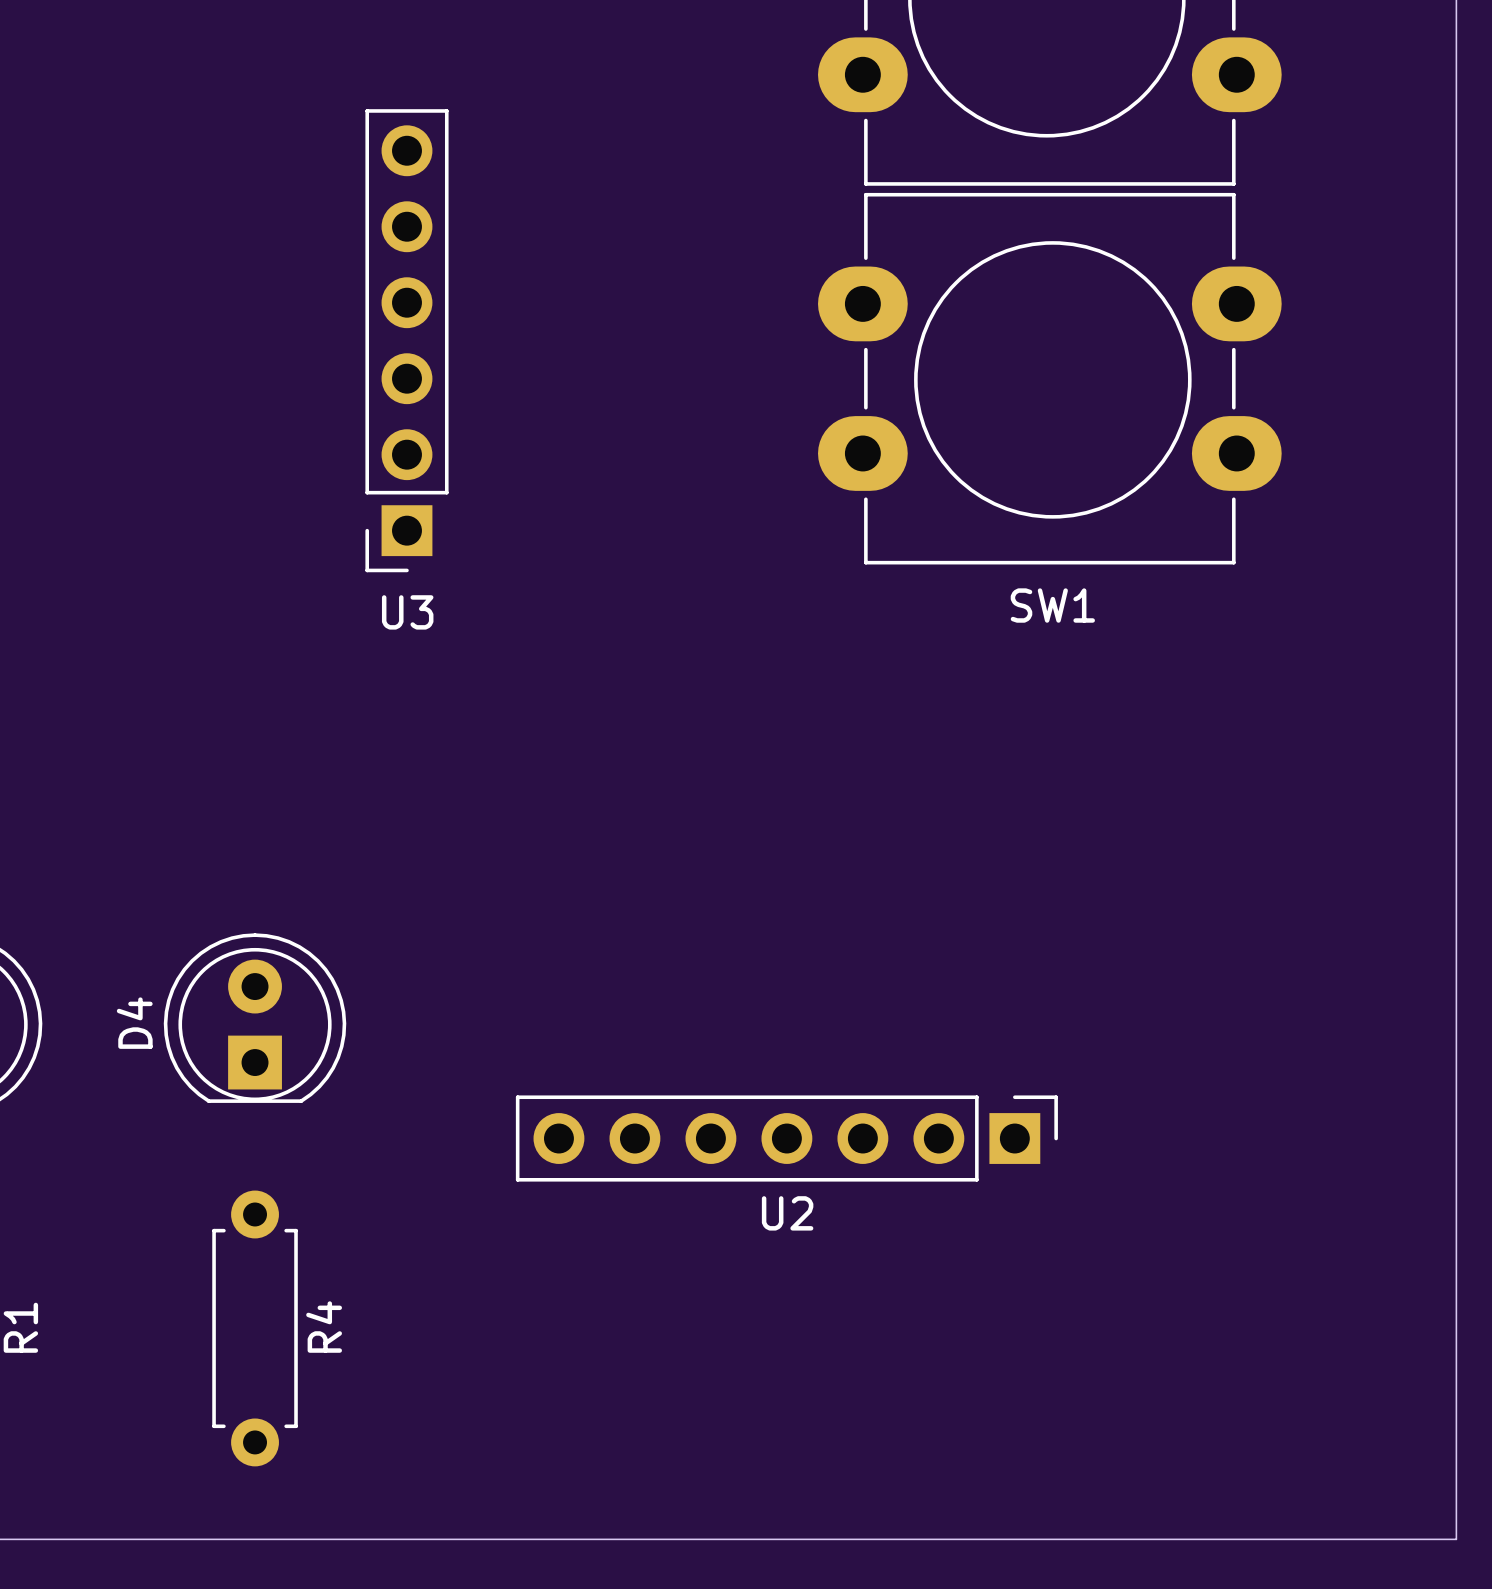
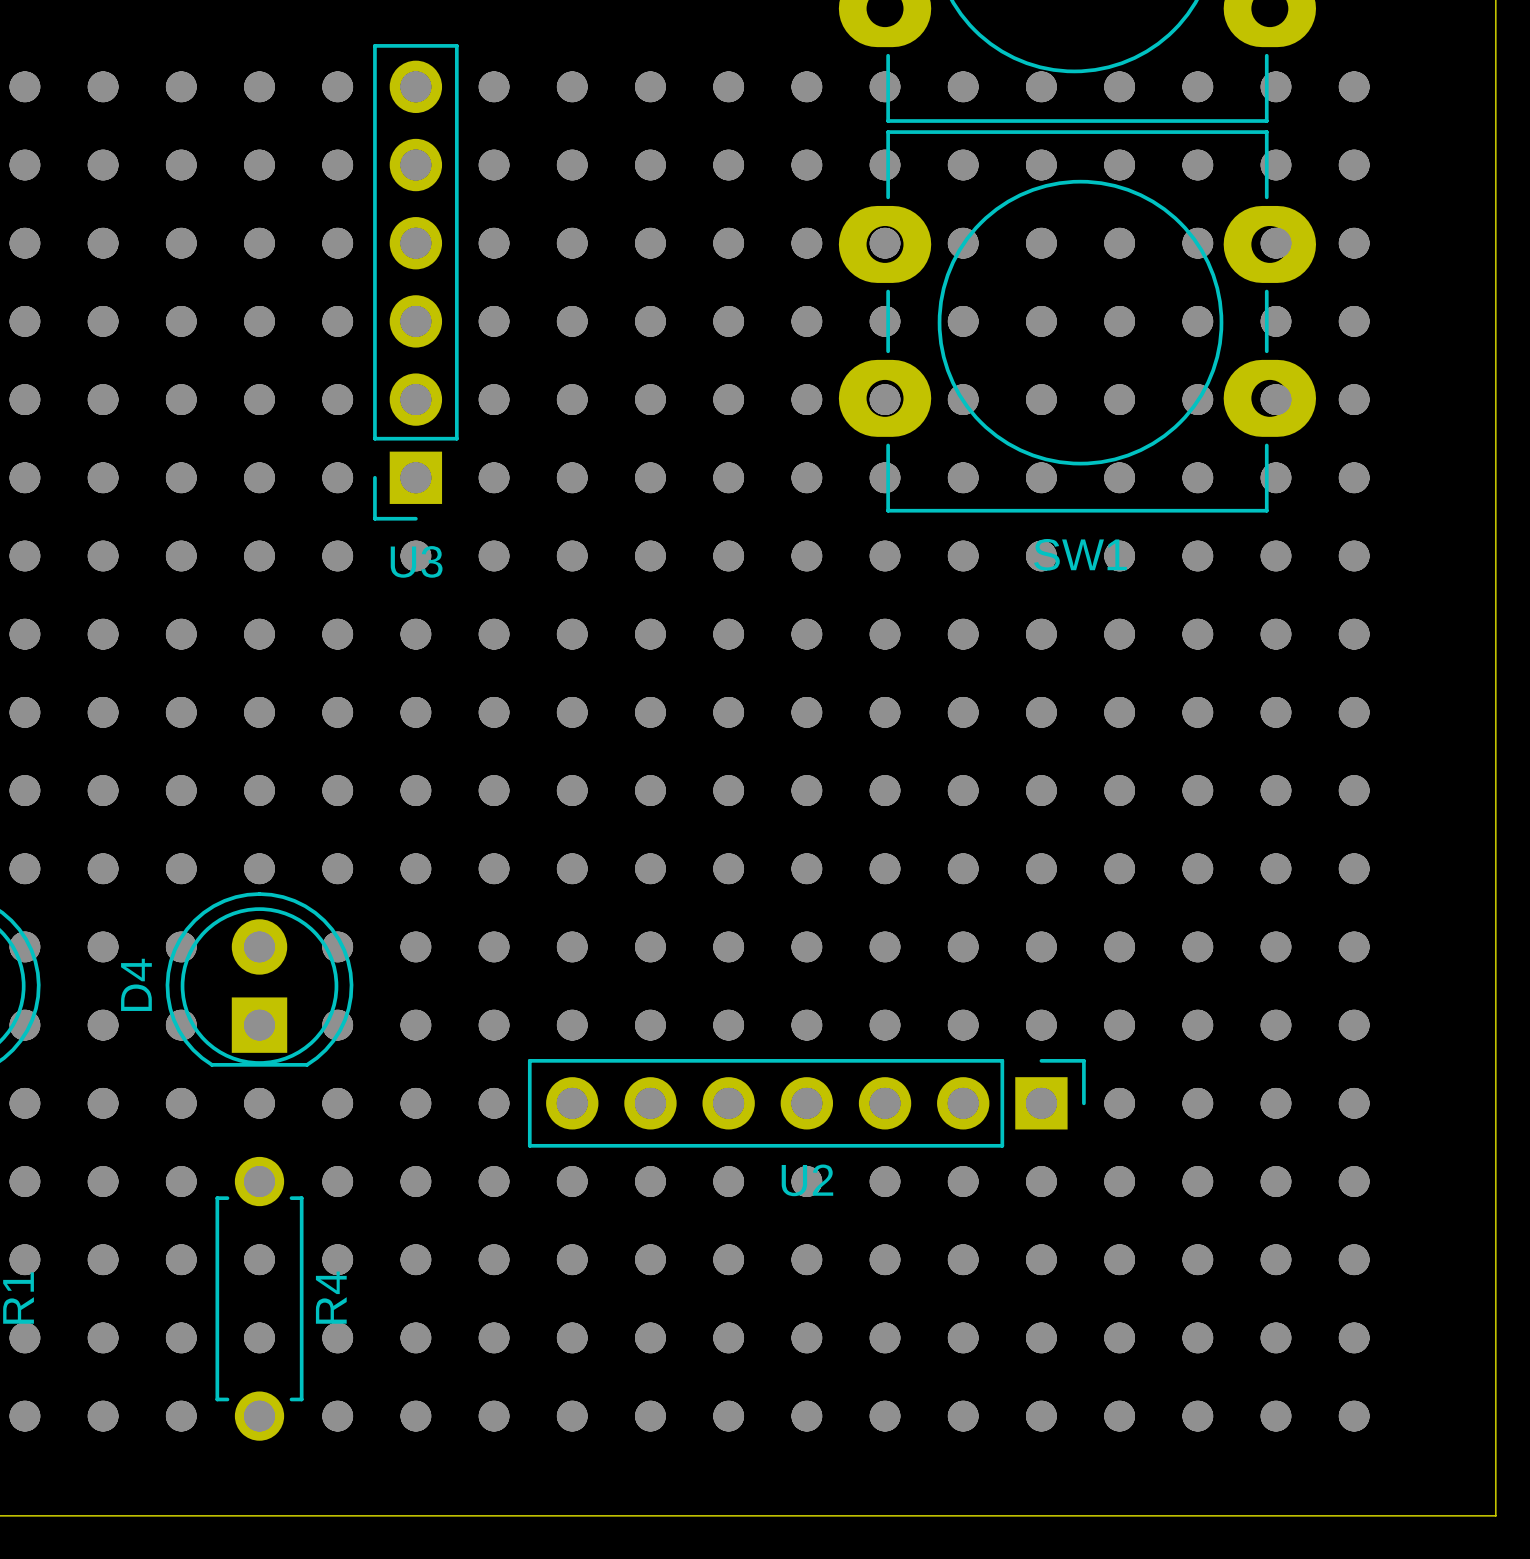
drawing: none -> [9, 71, 41, 103]
drawing: none -> [87, 71, 119, 103]
drawing: none -> [165, 71, 197, 103]
drawing: none -> [244, 71, 275, 103]
drawing: none -> [322, 71, 354, 103]
drawing: none -> [400, 71, 432, 103]
drawing: none -> [478, 71, 510, 103]
drawing: none -> [556, 71, 588, 103]
drawing: none -> [635, 71, 666, 103]
drawing: none -> [713, 71, 745, 103]
drawing: none -> [791, 71, 823, 103]
drawing: none -> [869, 71, 901, 103]
drawing: none -> [947, 71, 979, 103]
drawing: none -> [1026, 71, 1057, 103]
drawing: none -> [1104, 71, 1136, 103]
drawing: none -> [1182, 71, 1214, 103]
drawing: none -> [1260, 71, 1292, 103]
drawing: none -> [1338, 71, 1370, 103]
drawing: none -> [9, 149, 41, 181]
drawing: none -> [87, 149, 119, 181]
drawing: none -> [165, 149, 197, 181]
drawing: none -> [244, 149, 275, 181]
drawing: none -> [322, 149, 354, 181]
drawing: none -> [400, 149, 432, 181]
drawing: none -> [478, 149, 510, 181]
drawing: none -> [556, 149, 588, 181]
drawing: none -> [635, 149, 666, 181]
drawing: none -> [713, 149, 745, 181]
drawing: none -> [791, 149, 823, 181]
drawing: none -> [869, 149, 901, 181]
drawing: none -> [947, 149, 979, 181]
drawing: none -> [1026, 149, 1057, 181]
drawing: none -> [1104, 149, 1136, 181]
drawing: none -> [1182, 149, 1214, 181]
drawing: none -> [1260, 149, 1292, 181]
drawing: none -> [1338, 149, 1370, 181]
drawing: none -> [9, 227, 41, 259]
drawing: none -> [87, 227, 119, 259]
drawing: none -> [165, 227, 197, 259]
drawing: none -> [244, 227, 275, 259]
drawing: none -> [322, 227, 354, 259]
drawing: none -> [400, 227, 432, 259]
drawing: none -> [478, 227, 510, 259]
drawing: none -> [556, 227, 588, 259]
drawing: none -> [635, 227, 666, 259]
drawing: none -> [713, 227, 745, 259]
drawing: none -> [791, 227, 823, 259]
drawing: none -> [869, 227, 901, 259]
drawing: none -> [947, 227, 979, 259]
drawing: none -> [1026, 227, 1057, 259]
drawing: none -> [1104, 227, 1136, 259]
drawing: none -> [1182, 227, 1214, 259]
drawing: none -> [1260, 227, 1292, 259]
drawing: none -> [1338, 227, 1370, 259]
drawing: none -> [9, 306, 41, 337]
drawing: none -> [87, 306, 119, 337]
drawing: none -> [165, 306, 197, 337]
drawing: none -> [244, 306, 275, 337]
drawing: none -> [322, 306, 354, 337]
drawing: none -> [400, 306, 432, 337]
drawing: none -> [478, 306, 510, 337]
drawing: none -> [556, 306, 588, 337]
drawing: none -> [635, 306, 666, 337]
drawing: none -> [713, 306, 745, 337]
drawing: none -> [791, 306, 823, 337]
drawing: none -> [869, 306, 901, 337]
drawing: none -> [947, 306, 979, 337]
drawing: none -> [1026, 306, 1057, 337]
drawing: none -> [1104, 306, 1136, 337]
drawing: none -> [1182, 306, 1214, 337]
drawing: none -> [1260, 306, 1292, 337]
drawing: none -> [1338, 306, 1370, 337]
drawing: none -> [9, 384, 41, 415]
drawing: none -> [87, 384, 119, 415]
drawing: none -> [165, 384, 197, 415]
drawing: none -> [244, 384, 275, 415]
drawing: none -> [322, 384, 354, 415]
drawing: none -> [400, 384, 432, 415]
drawing: none -> [478, 384, 510, 415]
drawing: none -> [556, 384, 588, 415]
drawing: none -> [635, 384, 666, 415]
drawing: none -> [713, 384, 745, 415]
drawing: none -> [791, 384, 823, 415]
drawing: none -> [869, 384, 901, 415]
drawing: none -> [947, 384, 979, 415]
drawing: none -> [1026, 384, 1057, 415]
drawing: none -> [1104, 384, 1136, 415]
drawing: none -> [1182, 384, 1214, 415]
drawing: none -> [1260, 384, 1292, 415]
drawing: none -> [1338, 384, 1370, 415]
drawing: none -> [9, 462, 41, 494]
drawing: none -> [87, 462, 119, 494]
drawing: none -> [165, 462, 197, 494]
drawing: none -> [244, 462, 275, 494]
drawing: none -> [322, 462, 354, 494]
drawing: none -> [400, 462, 432, 494]
drawing: none -> [478, 462, 510, 494]
drawing: none -> [556, 462, 588, 494]
drawing: none -> [635, 462, 666, 494]
drawing: none -> [713, 462, 745, 494]
drawing: none -> [791, 462, 823, 494]
drawing: none -> [869, 462, 901, 494]
drawing: none -> [947, 462, 979, 494]
drawing: none -> [1026, 462, 1057, 494]
drawing: none -> [1104, 462, 1136, 494]
drawing: none -> [1182, 462, 1214, 494]
drawing: none -> [1260, 462, 1292, 494]
drawing: none -> [1338, 462, 1370, 494]
drawing: none -> [9, 540, 41, 572]
drawing: none -> [87, 540, 119, 572]
drawing: none -> [165, 540, 197, 572]
drawing: none -> [244, 540, 275, 572]
drawing: none -> [322, 540, 354, 572]
drawing: none -> [400, 540, 432, 572]
drawing: none -> [478, 540, 510, 572]
drawing: none -> [556, 540, 588, 572]
drawing: none -> [635, 540, 666, 572]
drawing: none -> [713, 540, 745, 572]
drawing: none -> [791, 540, 823, 572]
drawing: none -> [869, 540, 901, 572]
drawing: none -> [947, 540, 979, 572]
drawing: none -> [1026, 540, 1057, 572]
drawing: none -> [1104, 540, 1136, 572]
drawing: none -> [1182, 540, 1214, 572]
drawing: none -> [1260, 540, 1292, 572]
drawing: none -> [1338, 540, 1370, 572]
drawing: none -> [9, 618, 41, 650]
drawing: none -> [87, 618, 119, 650]
drawing: none -> [165, 618, 197, 650]
drawing: none -> [244, 618, 275, 650]
drawing: none -> [322, 618, 354, 650]
drawing: none -> [400, 618, 432, 650]
drawing: none -> [478, 618, 510, 650]
drawing: none -> [556, 618, 588, 650]
drawing: none -> [635, 618, 666, 650]
drawing: none -> [713, 618, 745, 650]
drawing: none -> [791, 618, 823, 650]
drawing: none -> [869, 618, 901, 650]
drawing: none -> [947, 618, 979, 650]
drawing: none -> [1026, 618, 1057, 650]
drawing: none -> [1104, 618, 1136, 650]
drawing: none -> [1182, 618, 1214, 650]
drawing: none -> [1260, 618, 1292, 650]
drawing: none -> [1338, 618, 1370, 650]
drawing: none -> [9, 696, 41, 728]
drawing: none -> [87, 696, 119, 728]
drawing: none -> [165, 696, 197, 728]
drawing: none -> [244, 696, 275, 728]
drawing: none -> [322, 696, 354, 728]
drawing: none -> [400, 696, 432, 728]
drawing: none -> [478, 696, 510, 728]
drawing: none -> [556, 696, 588, 728]
drawing: none -> [635, 696, 666, 728]
drawing: none -> [713, 696, 745, 728]
drawing: none -> [791, 696, 823, 728]
drawing: none -> [869, 696, 901, 728]
drawing: none -> [947, 696, 979, 728]
drawing: none -> [1026, 696, 1057, 728]
drawing: none -> [1104, 696, 1136, 728]
drawing: none -> [1182, 696, 1214, 728]
drawing: none -> [1260, 696, 1292, 728]
drawing: none -> [1338, 696, 1370, 728]
drawing: none -> [9, 775, 41, 806]
drawing: none -> [87, 775, 119, 806]
drawing: none -> [165, 775, 197, 806]
drawing: none -> [244, 775, 275, 806]
drawing: none -> [322, 775, 354, 806]
drawing: none -> [400, 775, 432, 806]
drawing: none -> [478, 775, 510, 806]
drawing: none -> [556, 775, 588, 806]
drawing: none -> [635, 775, 666, 806]
drawing: none -> [713, 775, 745, 806]
drawing: none -> [791, 775, 823, 806]
drawing: none -> [869, 775, 901, 806]
drawing: none -> [947, 775, 979, 806]
drawing: none -> [1026, 775, 1057, 806]
drawing: none -> [1104, 775, 1136, 806]
drawing: none -> [1182, 775, 1214, 806]
drawing: none -> [1260, 775, 1292, 806]
drawing: none -> [1338, 775, 1370, 806]
drawing: none -> [9, 853, 41, 885]
drawing: none -> [87, 853, 119, 885]
drawing: none -> [165, 853, 197, 885]
drawing: none -> [244, 853, 275, 885]
drawing: none -> [322, 853, 354, 885]
drawing: none -> [400, 853, 432, 885]
drawing: none -> [478, 853, 510, 885]
drawing: none -> [556, 853, 588, 885]
drawing: none -> [635, 853, 666, 885]
drawing: none -> [713, 853, 745, 885]
drawing: none -> [791, 853, 823, 885]
drawing: none -> [869, 853, 901, 885]
drawing: none -> [947, 853, 979, 885]
drawing: none -> [1026, 853, 1057, 885]
drawing: none -> [1104, 853, 1136, 885]
drawing: none -> [1182, 853, 1214, 885]
drawing: none -> [1260, 853, 1292, 885]
drawing: none -> [1338, 853, 1370, 885]
drawing: none -> [9, 931, 41, 963]
drawing: none -> [87, 931, 119, 963]
drawing: none -> [165, 931, 197, 963]
drawing: none -> [244, 931, 275, 963]
drawing: none -> [322, 931, 354, 963]
drawing: none -> [400, 931, 432, 963]
drawing: none -> [478, 931, 510, 963]
drawing: none -> [556, 931, 588, 963]
drawing: none -> [635, 931, 666, 963]
drawing: none -> [713, 931, 745, 963]
drawing: none -> [791, 931, 823, 963]
drawing: none -> [869, 931, 901, 963]
drawing: none -> [947, 931, 979, 963]
drawing: none -> [1026, 931, 1057, 963]
drawing: none -> [1104, 931, 1136, 963]
drawing: none -> [1182, 931, 1214, 963]
drawing: none -> [1260, 931, 1292, 963]
drawing: none -> [1338, 931, 1370, 963]
drawing: none -> [9, 1009, 41, 1041]
drawing: none -> [87, 1009, 119, 1041]
drawing: none -> [165, 1009, 197, 1041]
drawing: none -> [244, 1009, 275, 1041]
drawing: none -> [322, 1009, 354, 1041]
drawing: none -> [400, 1009, 432, 1041]
drawing: none -> [478, 1009, 510, 1041]
drawing: none -> [556, 1009, 588, 1041]
drawing: none -> [635, 1009, 666, 1041]
drawing: none -> [713, 1009, 745, 1041]
drawing: none -> [791, 1009, 823, 1041]
drawing: none -> [869, 1009, 901, 1041]
drawing: none -> [947, 1009, 979, 1041]
drawing: none -> [1026, 1009, 1057, 1041]
drawing: none -> [1104, 1009, 1136, 1041]
drawing: none -> [1182, 1009, 1214, 1041]
drawing: none -> [1260, 1009, 1292, 1041]
drawing: none -> [1338, 1009, 1370, 1041]
drawing: none -> [9, 1087, 41, 1119]
drawing: none -> [87, 1087, 119, 1119]
drawing: none -> [165, 1087, 197, 1119]
drawing: none -> [244, 1087, 275, 1119]
drawing: none -> [322, 1087, 354, 1119]
drawing: none -> [400, 1087, 432, 1119]
drawing: none -> [478, 1087, 510, 1119]
drawing: none -> [556, 1087, 588, 1119]
drawing: none -> [635, 1087, 666, 1119]
drawing: none -> [713, 1087, 745, 1119]
drawing: none -> [791, 1087, 823, 1119]
drawing: none -> [869, 1087, 901, 1119]
drawing: none -> [947, 1087, 979, 1119]
drawing: none -> [1026, 1087, 1057, 1119]
drawing: none -> [1104, 1087, 1136, 1119]
drawing: none -> [1182, 1087, 1214, 1119]
drawing: none -> [1260, 1087, 1292, 1119]
drawing: none -> [1338, 1087, 1370, 1119]
drawing: none -> [9, 1166, 41, 1197]
drawing: none -> [87, 1166, 119, 1197]
drawing: none -> [165, 1166, 197, 1197]
drawing: none -> [244, 1166, 275, 1197]
drawing: none -> [322, 1166, 354, 1197]
drawing: none -> [400, 1166, 432, 1197]
drawing: none -> [478, 1166, 510, 1197]
drawing: none -> [556, 1166, 588, 1197]
drawing: none -> [635, 1166, 666, 1197]
drawing: none -> [713, 1166, 745, 1197]
drawing: none -> [791, 1166, 823, 1197]
drawing: none -> [869, 1166, 901, 1197]
drawing: none -> [947, 1166, 979, 1197]
drawing: none -> [1026, 1166, 1057, 1197]
drawing: none -> [1104, 1166, 1136, 1197]
drawing: none -> [1182, 1166, 1214, 1197]
drawing: none -> [1260, 1166, 1292, 1197]
drawing: none -> [1338, 1166, 1370, 1197]
drawing: none -> [9, 1244, 41, 1276]
drawing: none -> [87, 1244, 119, 1276]
drawing: none -> [165, 1244, 197, 1276]
drawing: none -> [244, 1244, 275, 1276]
drawing: none -> [322, 1244, 354, 1276]
drawing: none -> [400, 1244, 432, 1276]
drawing: none -> [478, 1244, 510, 1276]
drawing: none -> [556, 1244, 588, 1276]
drawing: none -> [635, 1244, 666, 1276]
drawing: none -> [713, 1244, 745, 1276]
drawing: none -> [791, 1244, 823, 1276]
drawing: none -> [869, 1244, 901, 1276]
drawing: none -> [947, 1244, 979, 1276]
drawing: none -> [1026, 1244, 1057, 1276]
drawing: none -> [1104, 1244, 1136, 1276]
drawing: none -> [1182, 1244, 1214, 1276]
drawing: none -> [1260, 1244, 1292, 1276]
drawing: none -> [1338, 1244, 1370, 1276]
drawing: none -> [9, 1322, 41, 1354]
drawing: none -> [87, 1322, 119, 1354]
drawing: none -> [165, 1322, 197, 1354]
drawing: none -> [244, 1322, 275, 1354]
drawing: none -> [322, 1322, 354, 1354]
drawing: none -> [400, 1322, 432, 1354]
drawing: none -> [478, 1322, 510, 1354]
drawing: none -> [556, 1322, 588, 1354]
drawing: none -> [635, 1322, 666, 1354]
drawing: none -> [713, 1322, 745, 1354]
drawing: none -> [791, 1322, 823, 1354]
drawing: none -> [869, 1322, 901, 1354]
drawing: none -> [947, 1322, 979, 1354]
drawing: none -> [1026, 1322, 1057, 1354]
drawing: none -> [1104, 1322, 1136, 1354]
drawing: none -> [1182, 1322, 1214, 1354]
drawing: none -> [1260, 1322, 1292, 1354]
drawing: none -> [1338, 1322, 1370, 1354]
drawing: none -> [9, 1400, 41, 1432]
drawing: none -> [87, 1400, 119, 1432]
drawing: none -> [165, 1400, 197, 1432]
drawing: none -> [244, 1400, 275, 1432]
drawing: none -> [322, 1400, 354, 1432]
drawing: none -> [400, 1400, 432, 1432]
drawing: none -> [478, 1400, 510, 1432]
drawing: none -> [556, 1400, 588, 1432]
drawing: none -> [635, 1400, 666, 1432]
drawing: none -> [713, 1400, 745, 1432]
drawing: none -> [791, 1400, 823, 1432]
drawing: none -> [869, 1400, 901, 1432]
drawing: none -> [947, 1400, 979, 1432]
drawing: none -> [1026, 1400, 1057, 1432]
drawing: none -> [1104, 1400, 1136, 1432]
drawing: none -> [1182, 1400, 1214, 1432]
drawing: none -> [1260, 1400, 1292, 1432]
drawing: none -> [1338, 1400, 1370, 1432]

